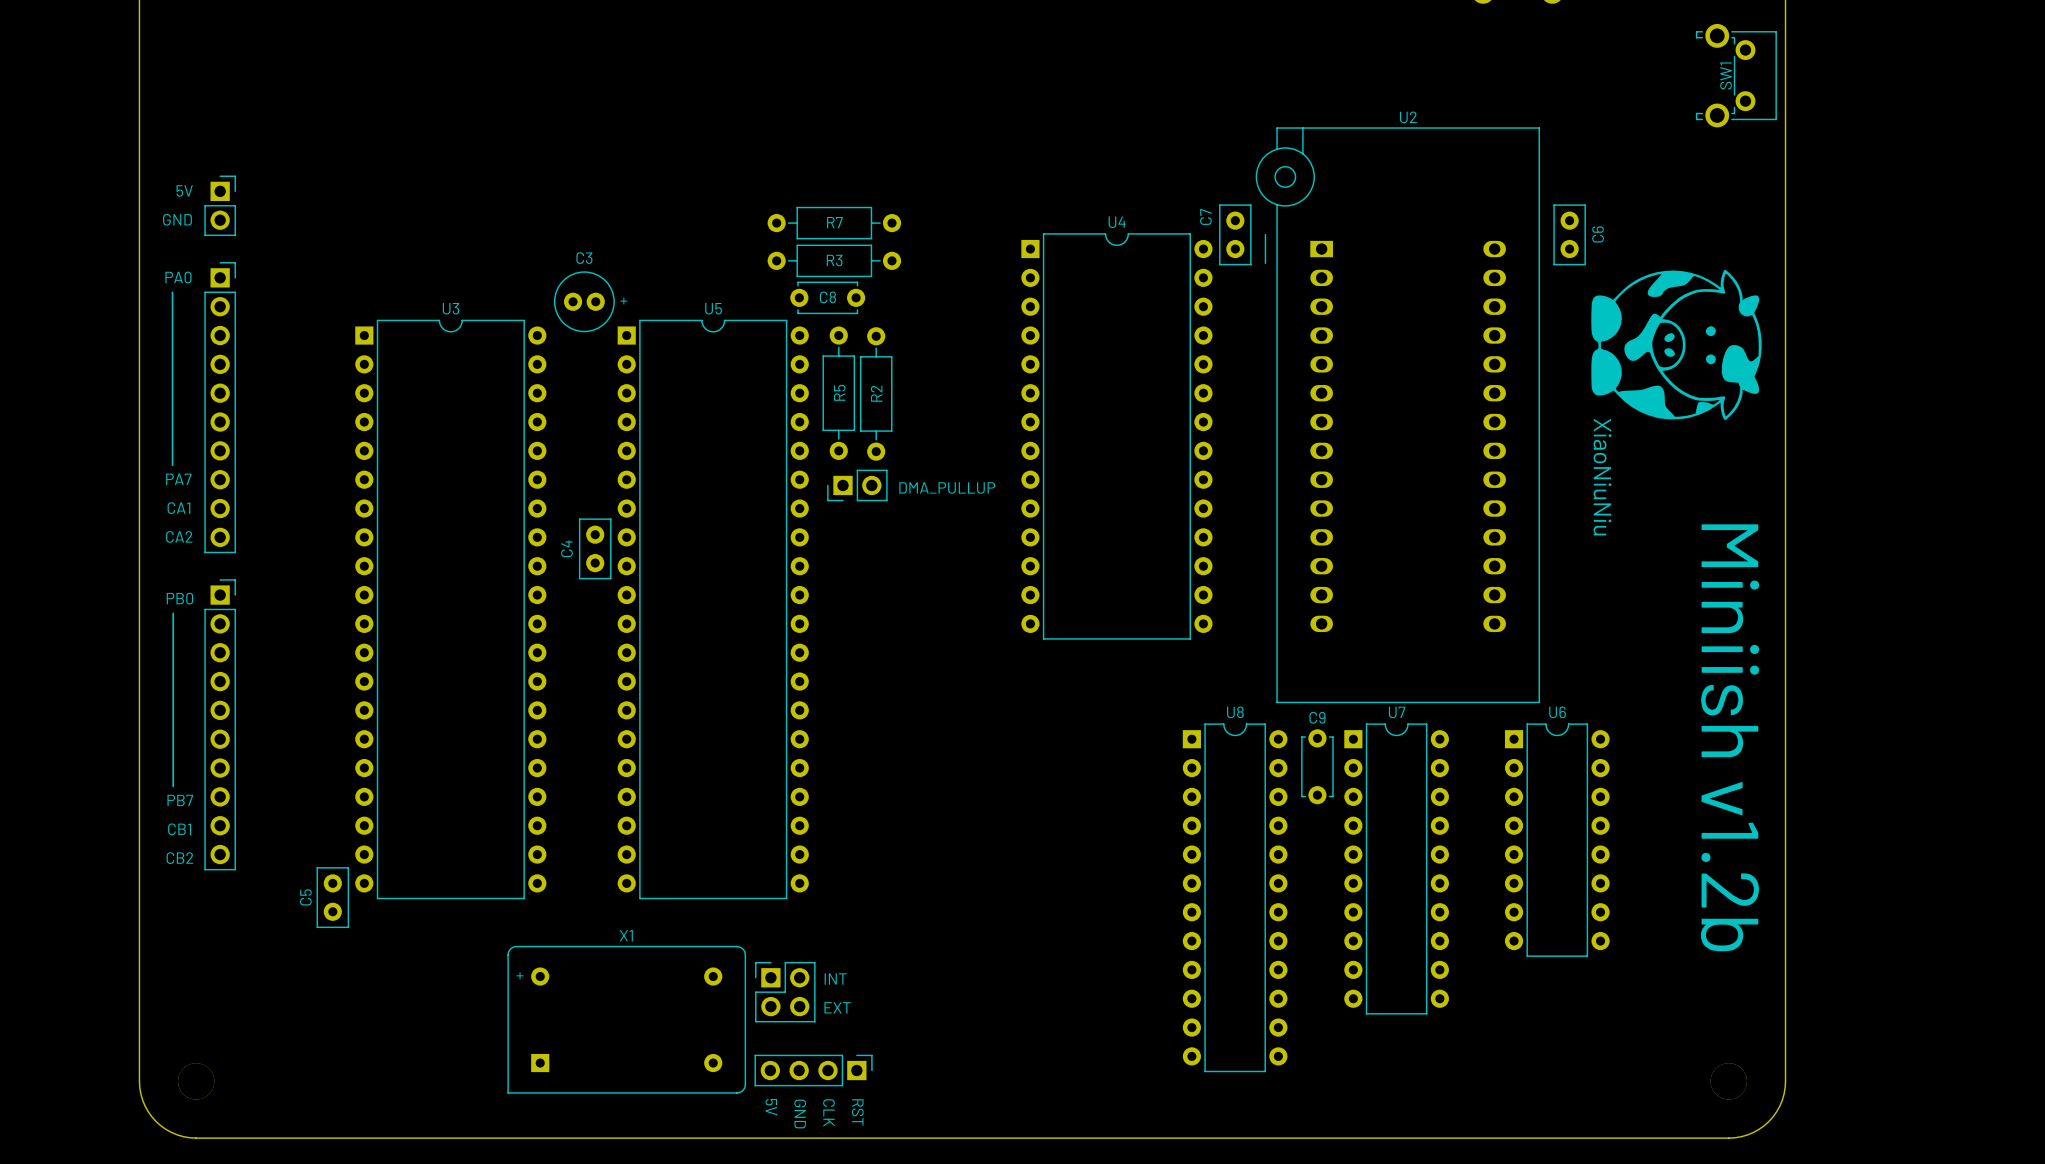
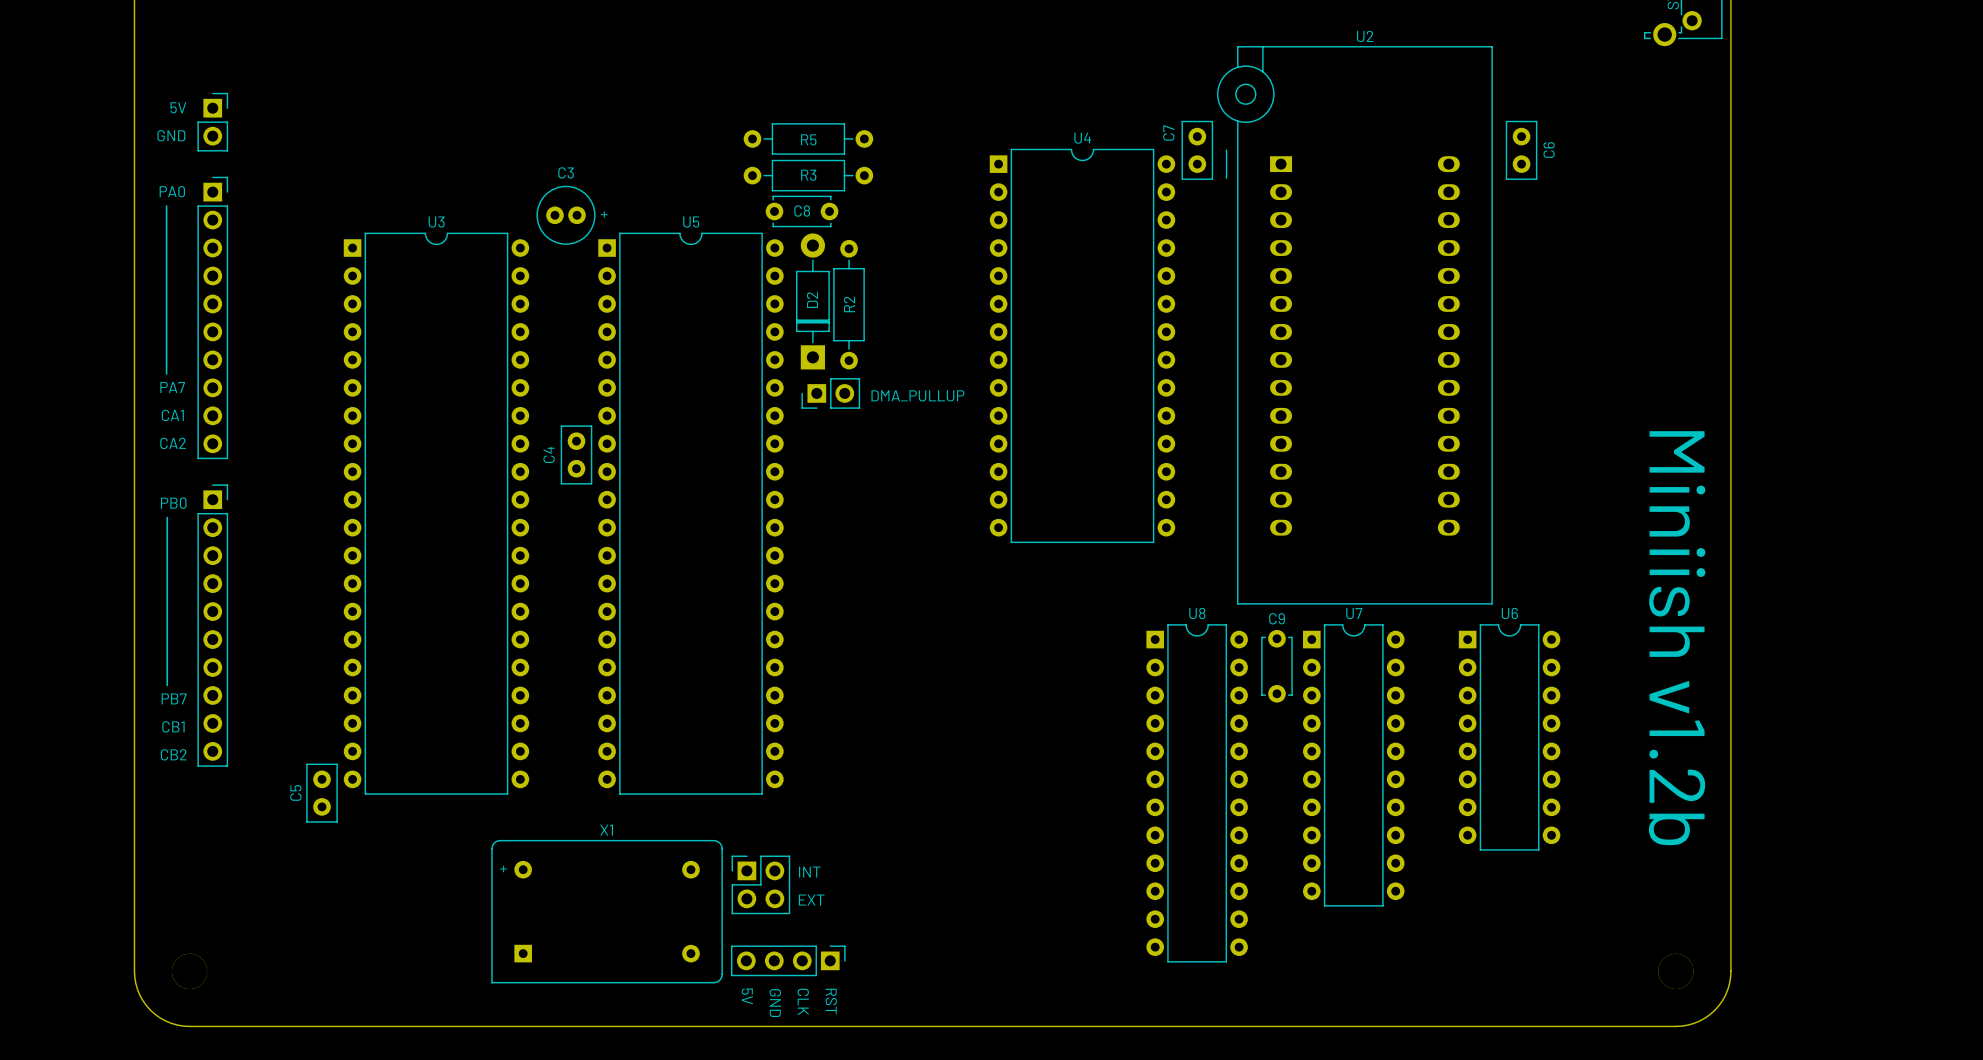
R7 name: R7 (834, 222) -> R5 (808, 139)
XiaoNiuNiu: (1676, 344) -> none
D2: none -> (812, 301)
R5: (838, 393) -> none

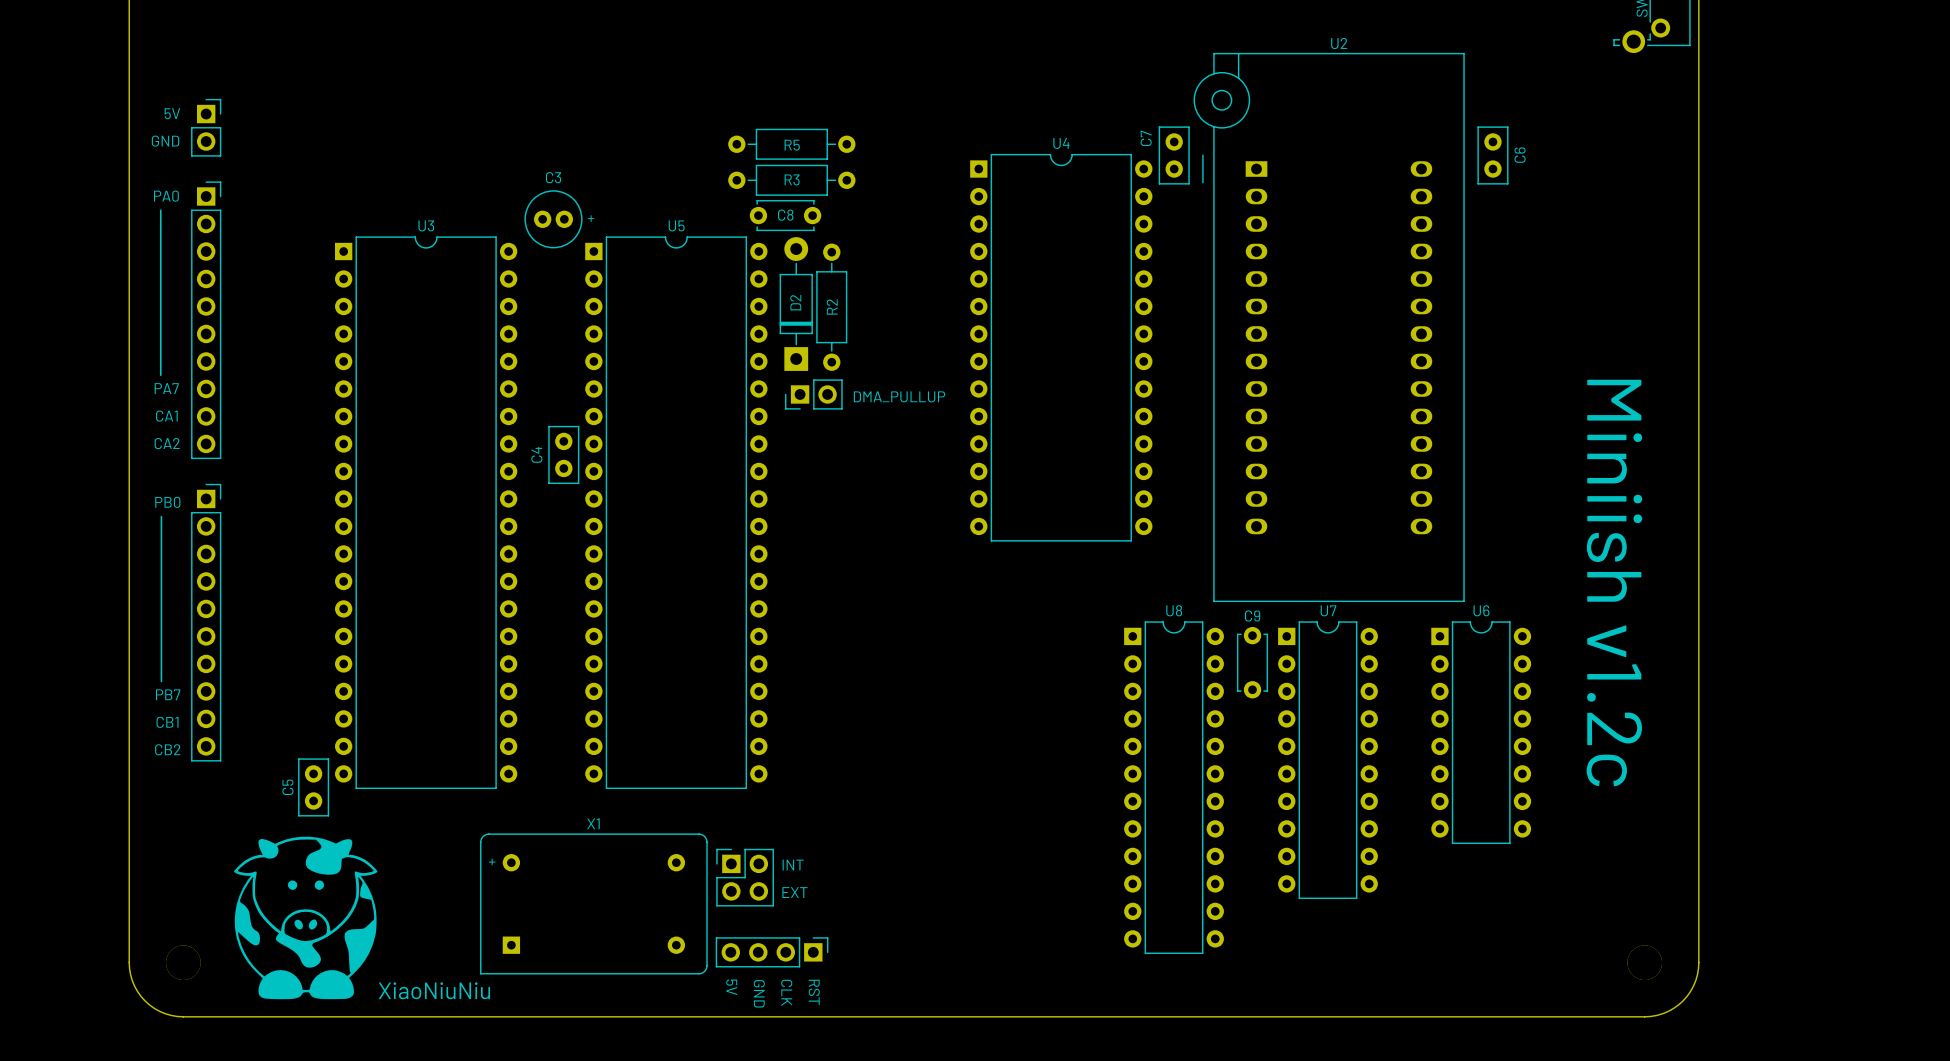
text: Miniish v1.2b (1677, 638) -> Miniish v1.2c (1614, 582)
XiaoNiuNiu: none -> (305, 917)

